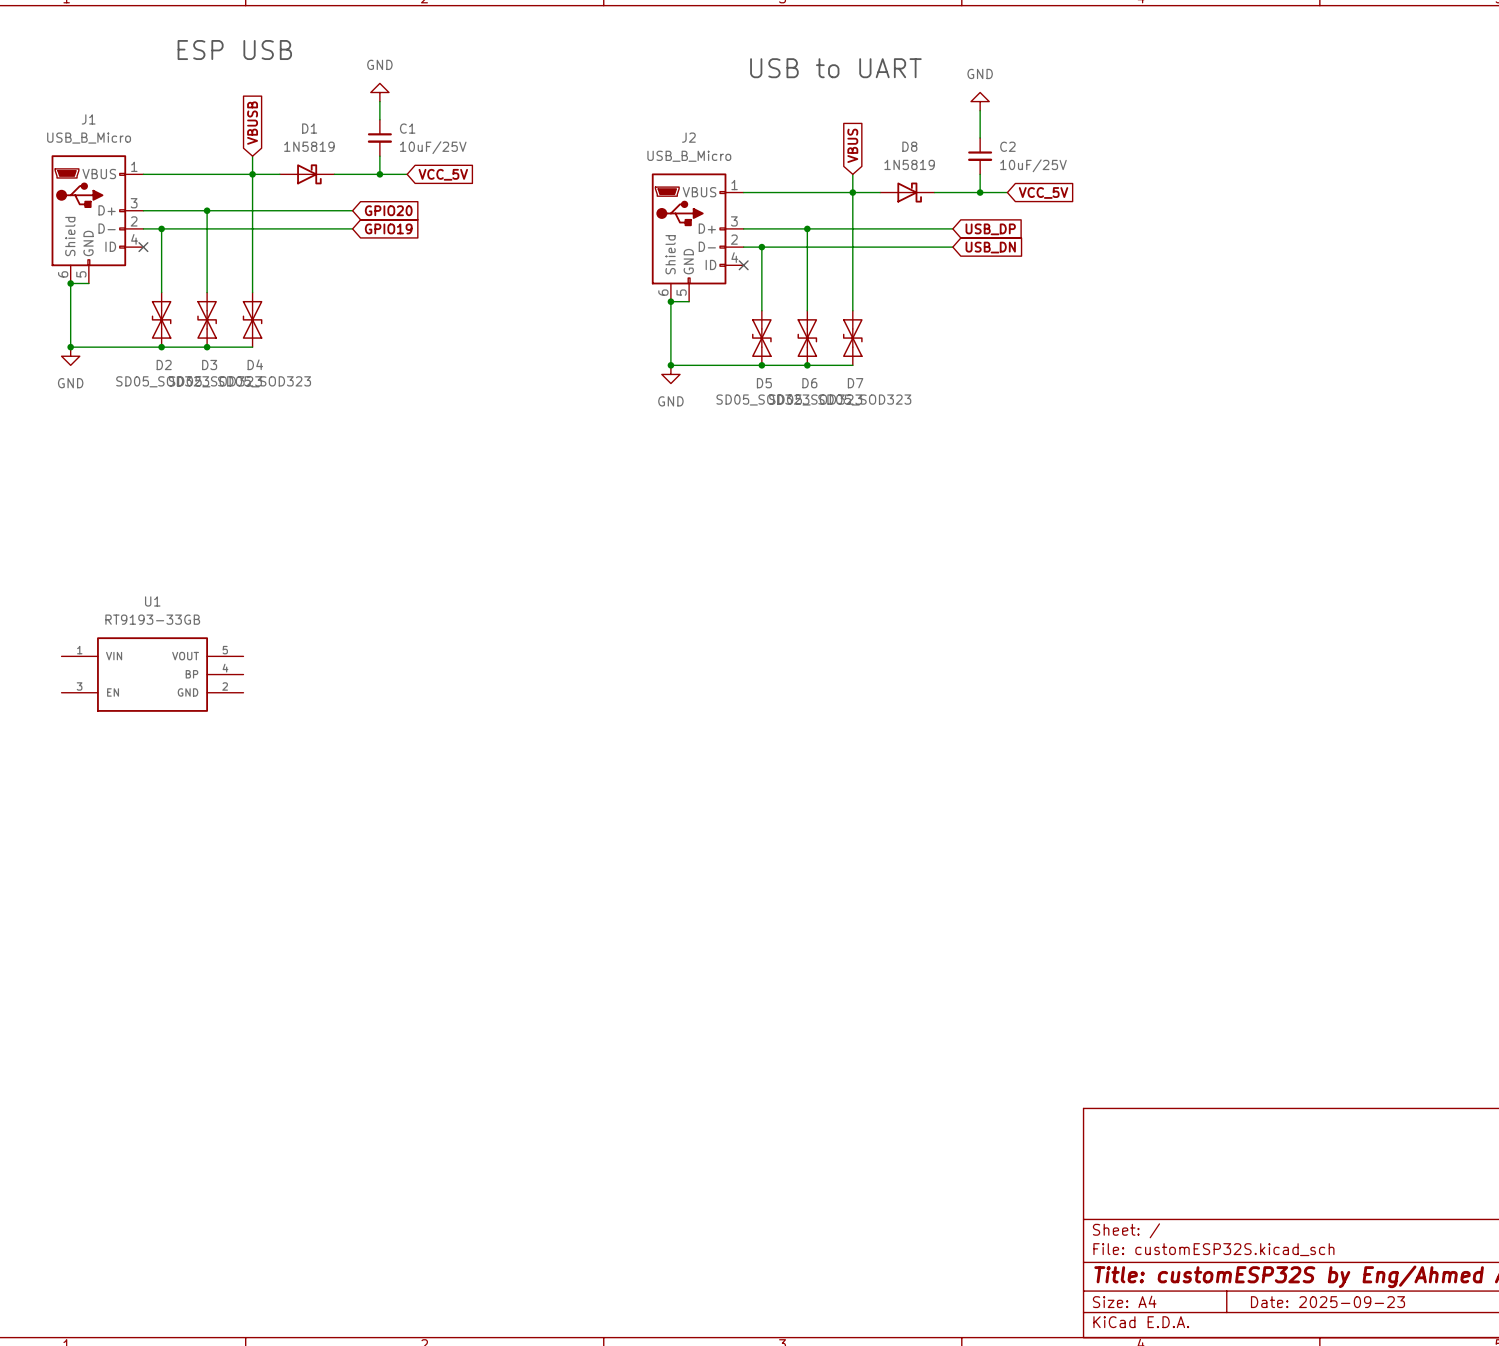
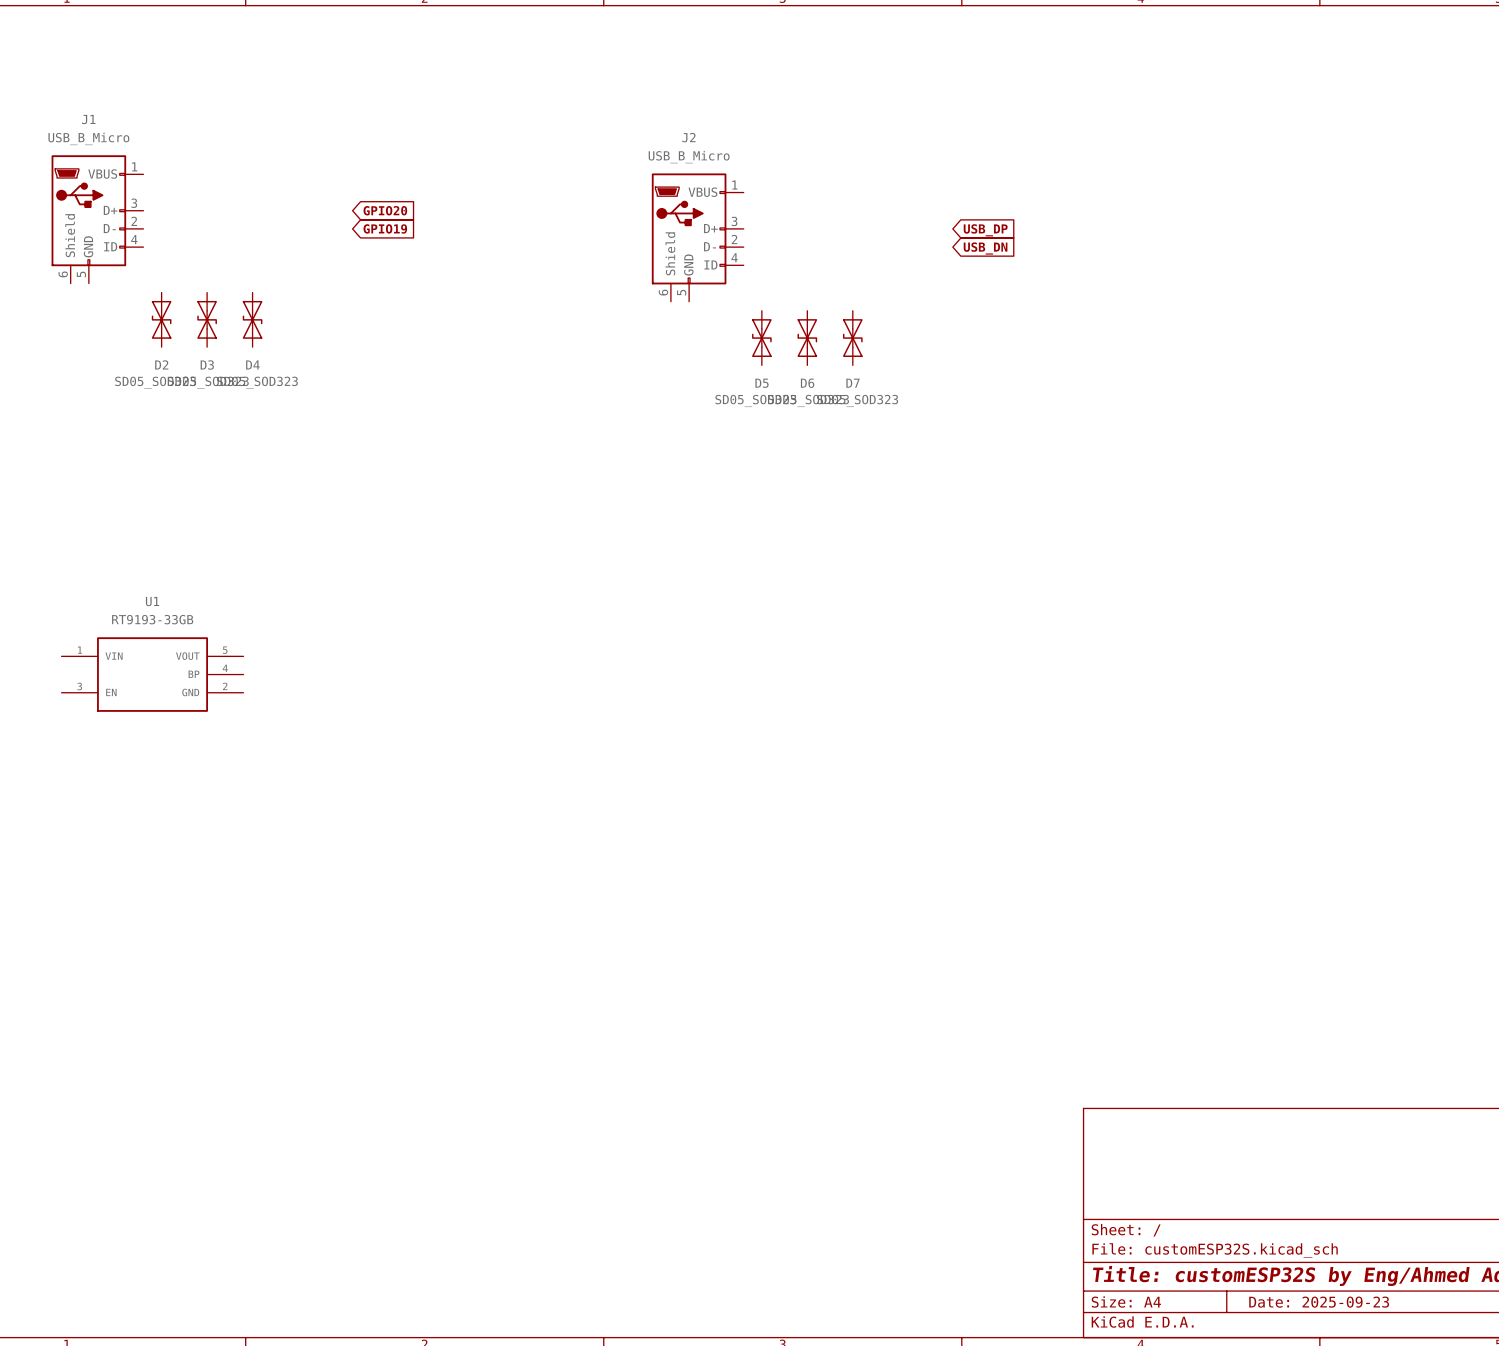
text: ESP USB (234, 50) -> none
text: USB to UART (835, 68) -> none
power symbol: GND (379, 92) -> none
wire: (379, 101) (379, 119) -> none
power symbol: GND (980, 101) -> none
wire: (980, 110) (980, 137) -> none
global label: VBUSB (252, 123) -> none
C1: 10uF/25V (379, 137) -> none
global label: VBUS (852, 145) -> none
wire: (252, 156) (252, 292) -> none
wire: (379, 156) (379, 174) -> none
C2: 10uF/25V (980, 156) -> none
wire: (143, 174) (279, 174) -> none
junction: (252, 174) -> none
D1: 1N5819 (307, 174) -> none
wire: (334, 174) (407, 174) -> none
junction: (379, 174) -> none
global label: VCC_5V (443, 174) -> none
wire: (852, 174) (852, 310) -> none
wire: (980, 174) (980, 192) -> none
wire: (743, 192) (880, 192) -> none
junction: (852, 192) -> none
D8: 1N5819 (907, 192) -> none
wire: (934, 192) (1007, 192) -> none
junction: (980, 192) -> none
global label: VCC_5V (1043, 192) -> none
wire: (143, 210) (352, 210) -> none
wire: (207, 210) (207, 292) -> none
junction: (207, 210) -> none
wire: (143, 228) (352, 228) -> none
wire: (161, 228) (161, 292) -> none
junction: (161, 228) -> none
wire: (743, 228) (952, 228) -> none
wire: (807, 228) (807, 310) -> none
junction: (807, 228) -> none
no-connect mark: (143, 247) -> none
wire: (743, 247) (952, 247) -> none
wire: (761, 247) (761, 310) -> none
junction: (761, 247) -> none
no-connect mark: (743, 265) -> none
junction: (70, 283) -> none
wire: (88, 283) (70, 283) (70, 347) (252, 347) -> none
junction: (670, 301) -> none
wire: (689, 301) (670, 301) (670, 365) (852, 365) -> none
junction: (70, 347) -> none
junction: (161, 347) -> none
junction: (207, 347) -> none
power symbol: GND (70, 356) -> none
junction: (670, 365) -> none
junction: (761, 365) -> none
junction: (807, 365) -> none
power symbol: GND (670, 374) -> none

